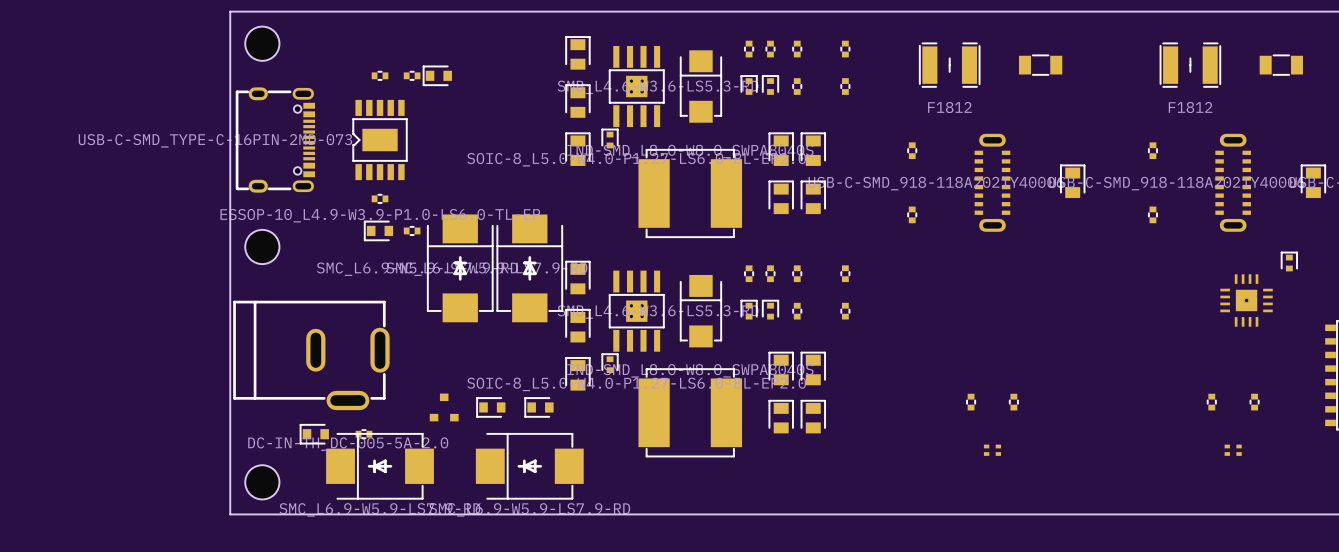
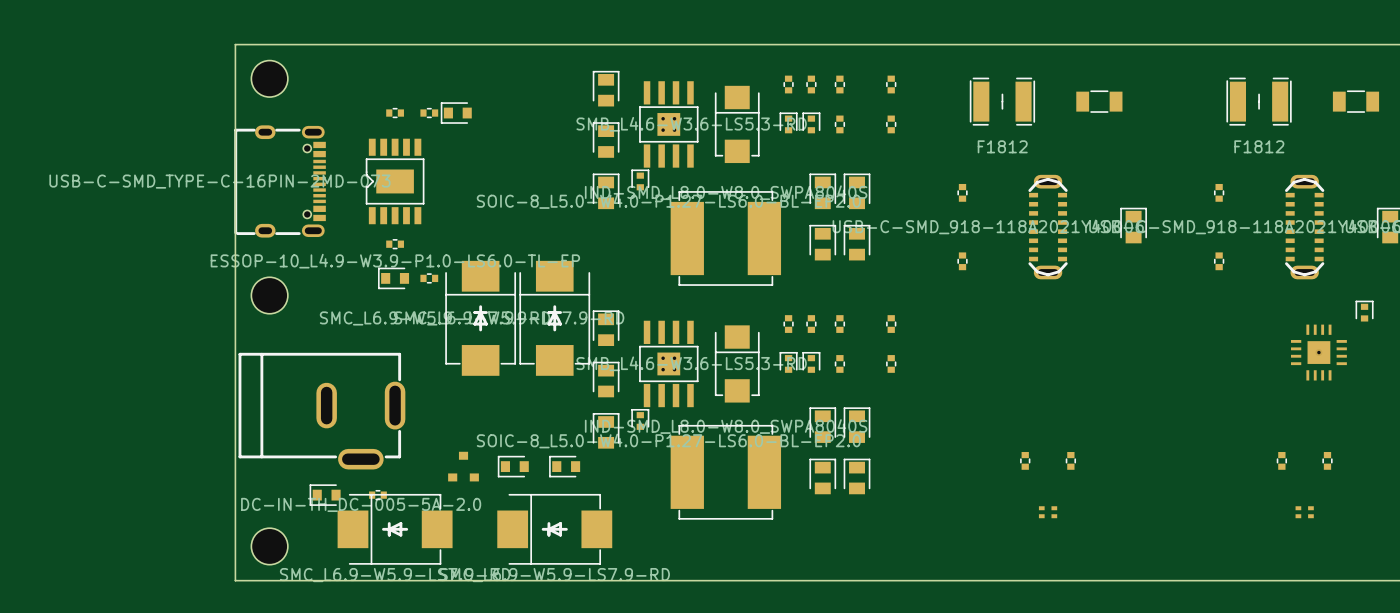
part footprint: [235, 87, 316, 193] -> [234, 125, 326, 238]
part footprint: [974, 133, 1011, 232] -> [1028, 174, 1068, 280]
part footprint: [1215, 133, 1252, 232] -> [1285, 174, 1325, 280]

